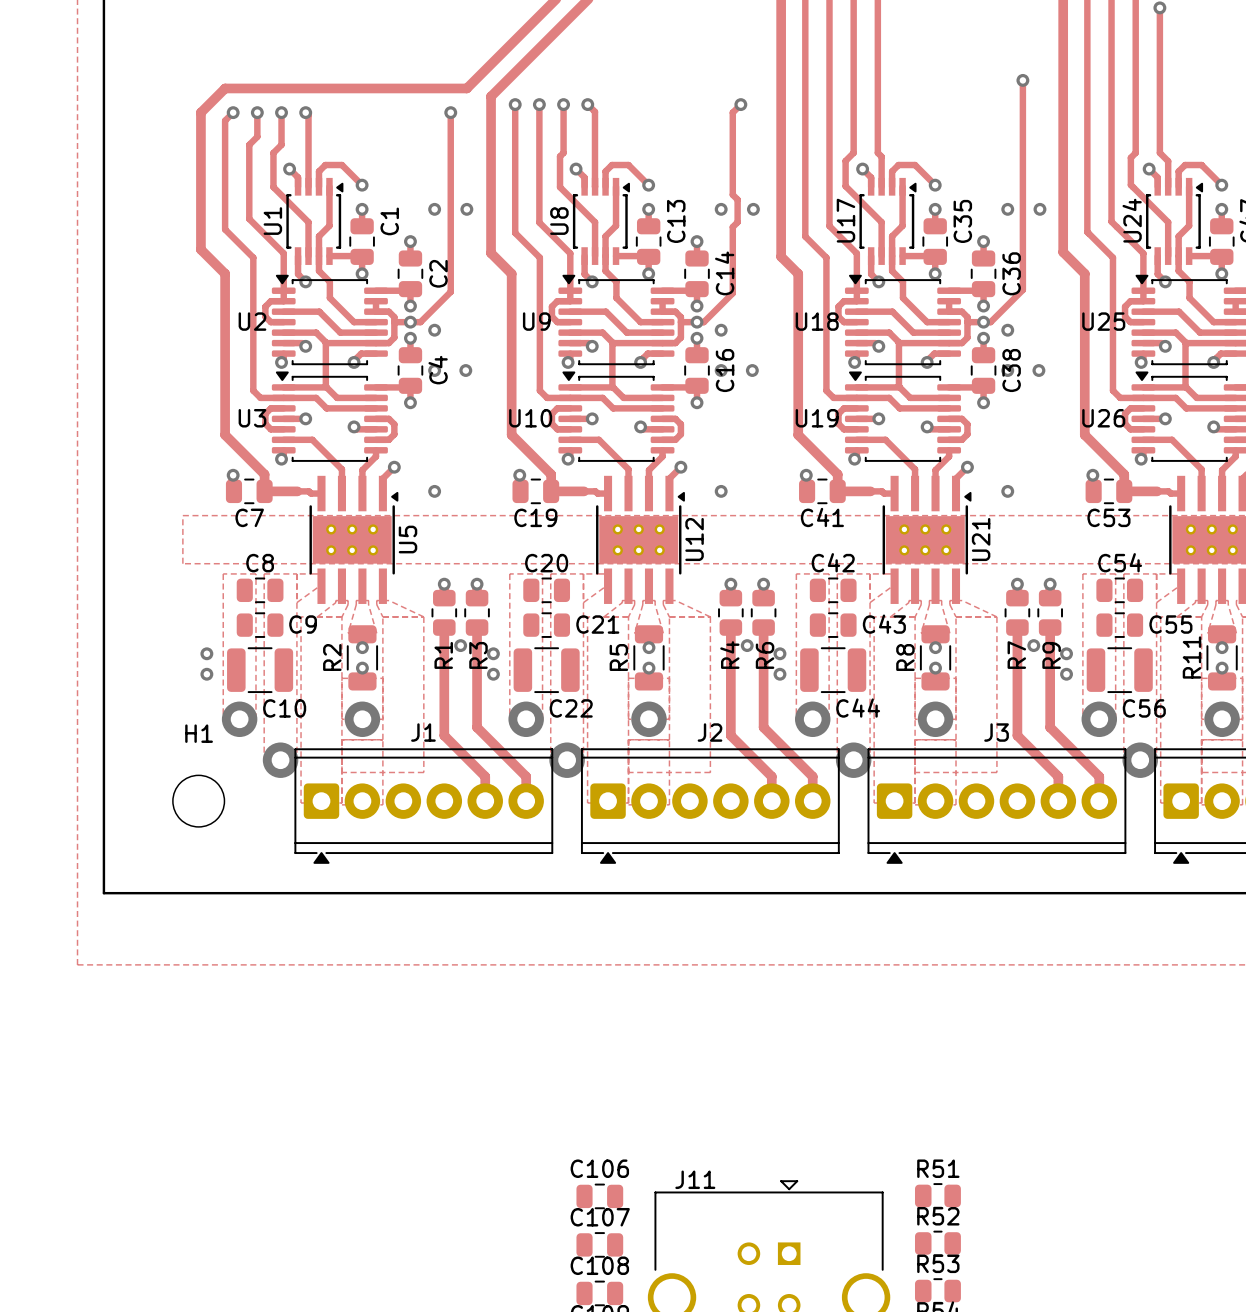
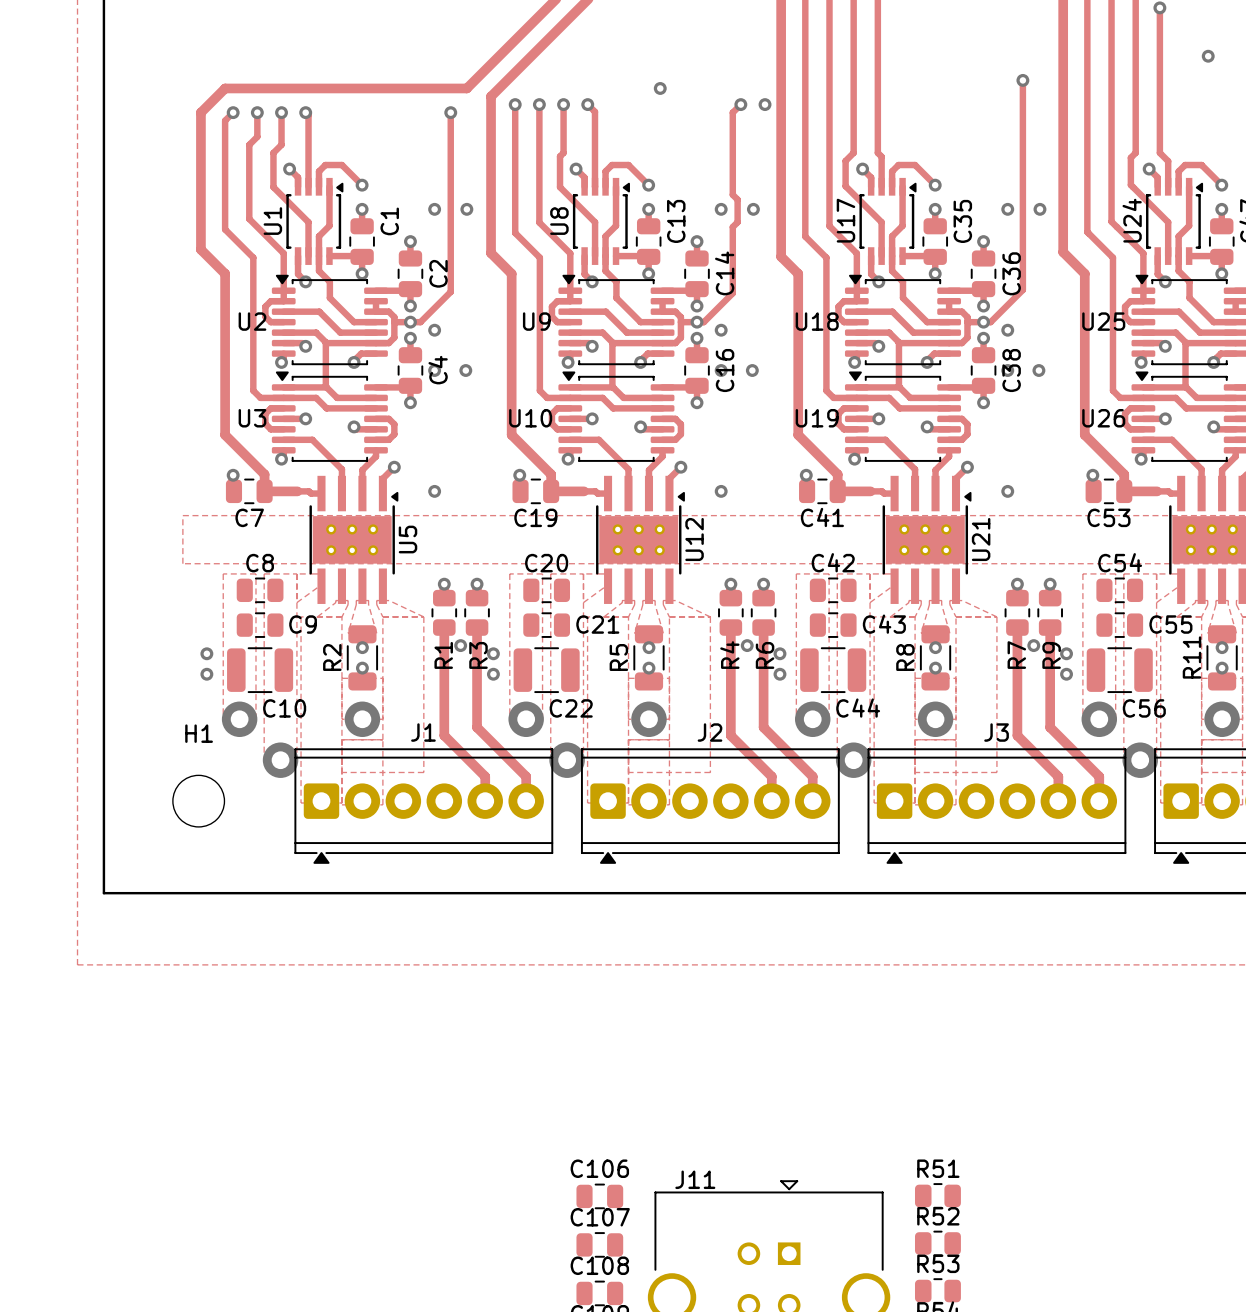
via: none -> (1208, 56)
via: none -> (660, 88)
via: none -> (765, 104)

